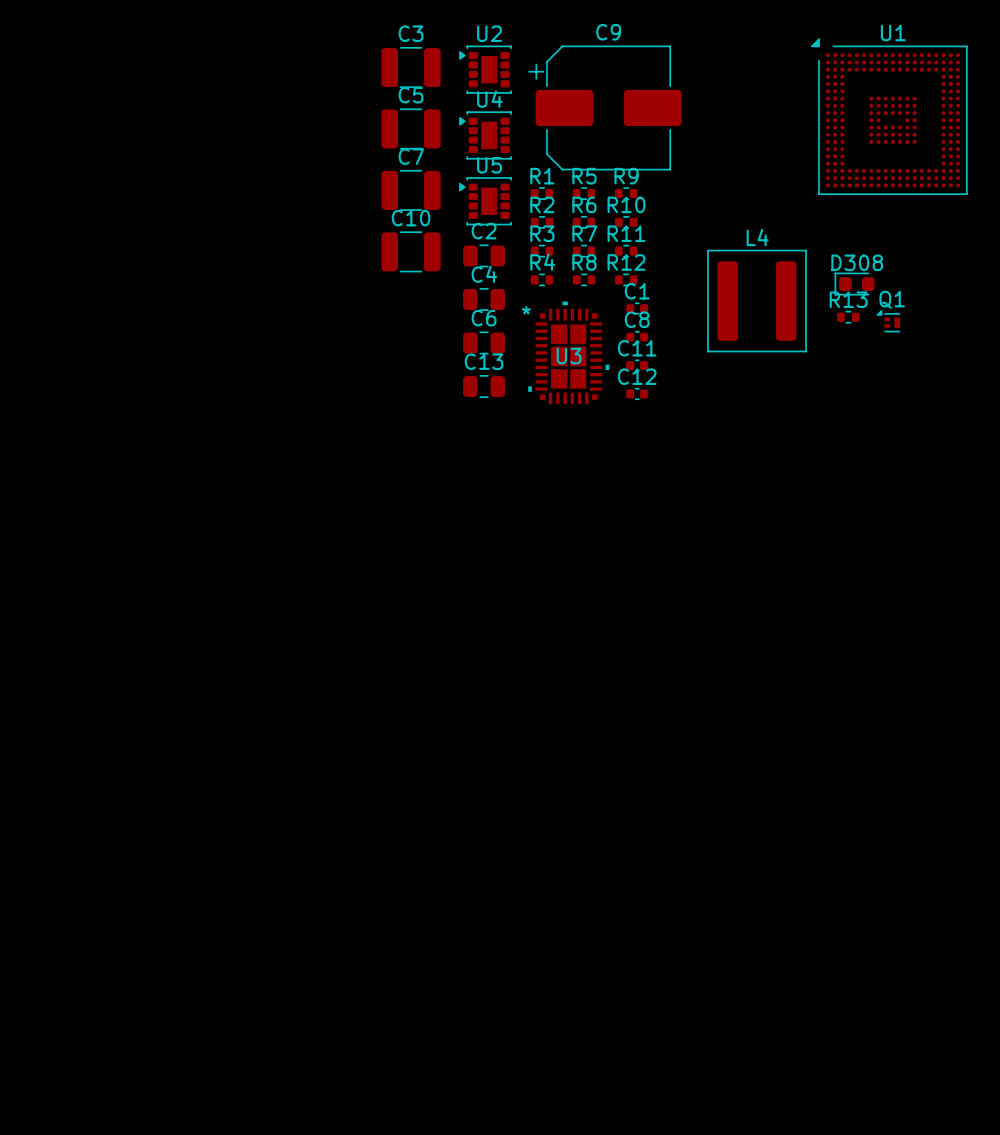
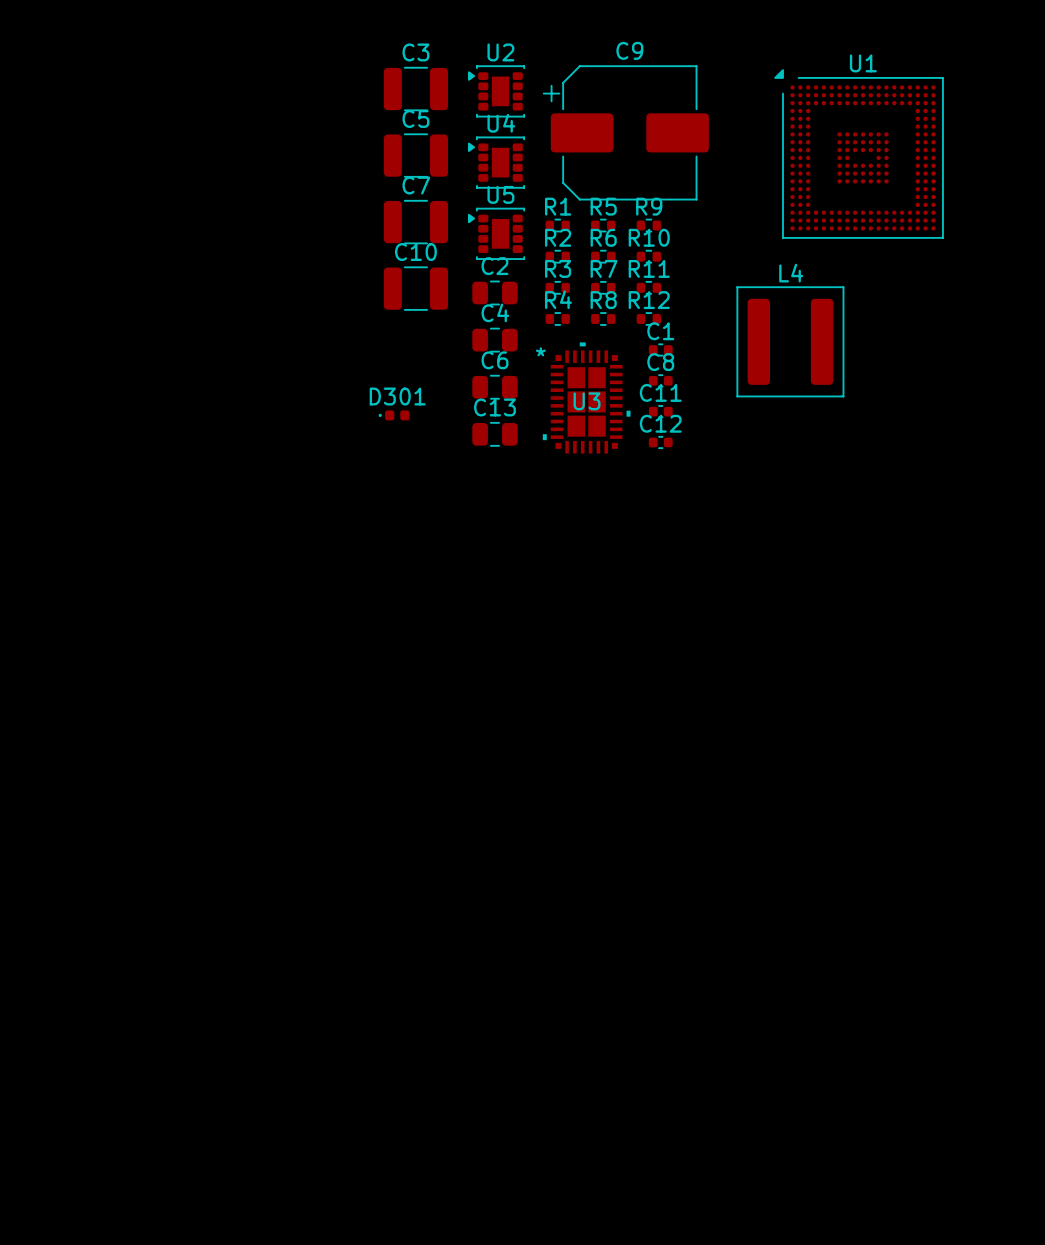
U1 position: (889, 116) -> (859, 154)
D308: (854, 284) -> none
R13: (848, 317) -> none
Q1: (888, 321) -> none
D301: none -> (394, 415)

